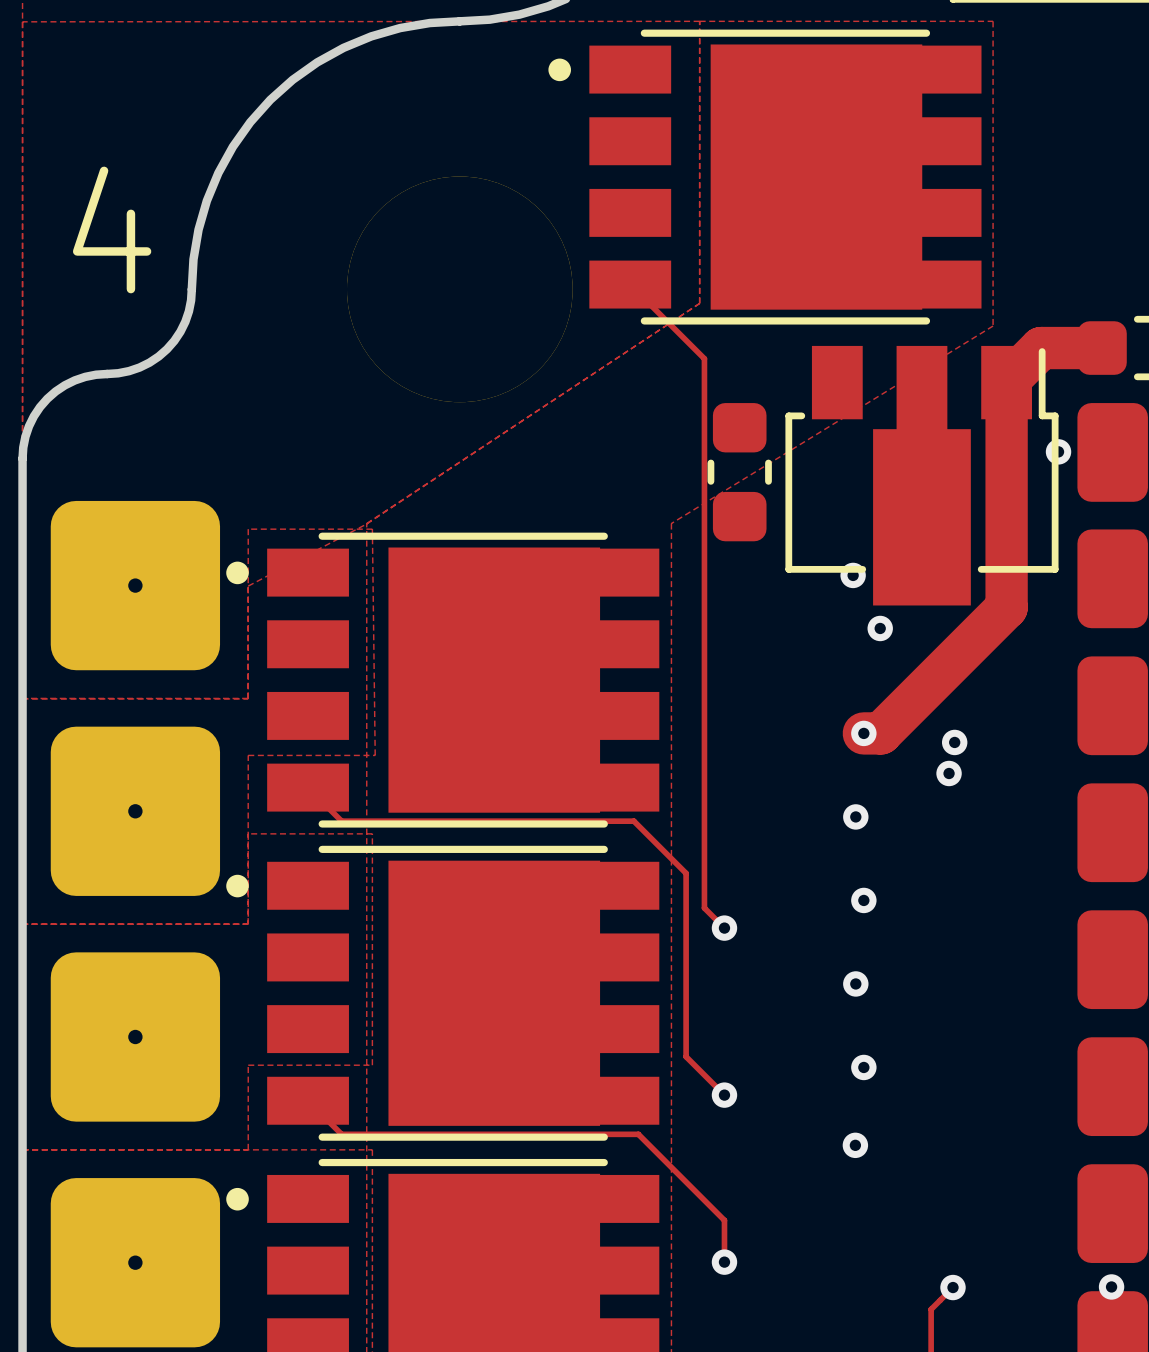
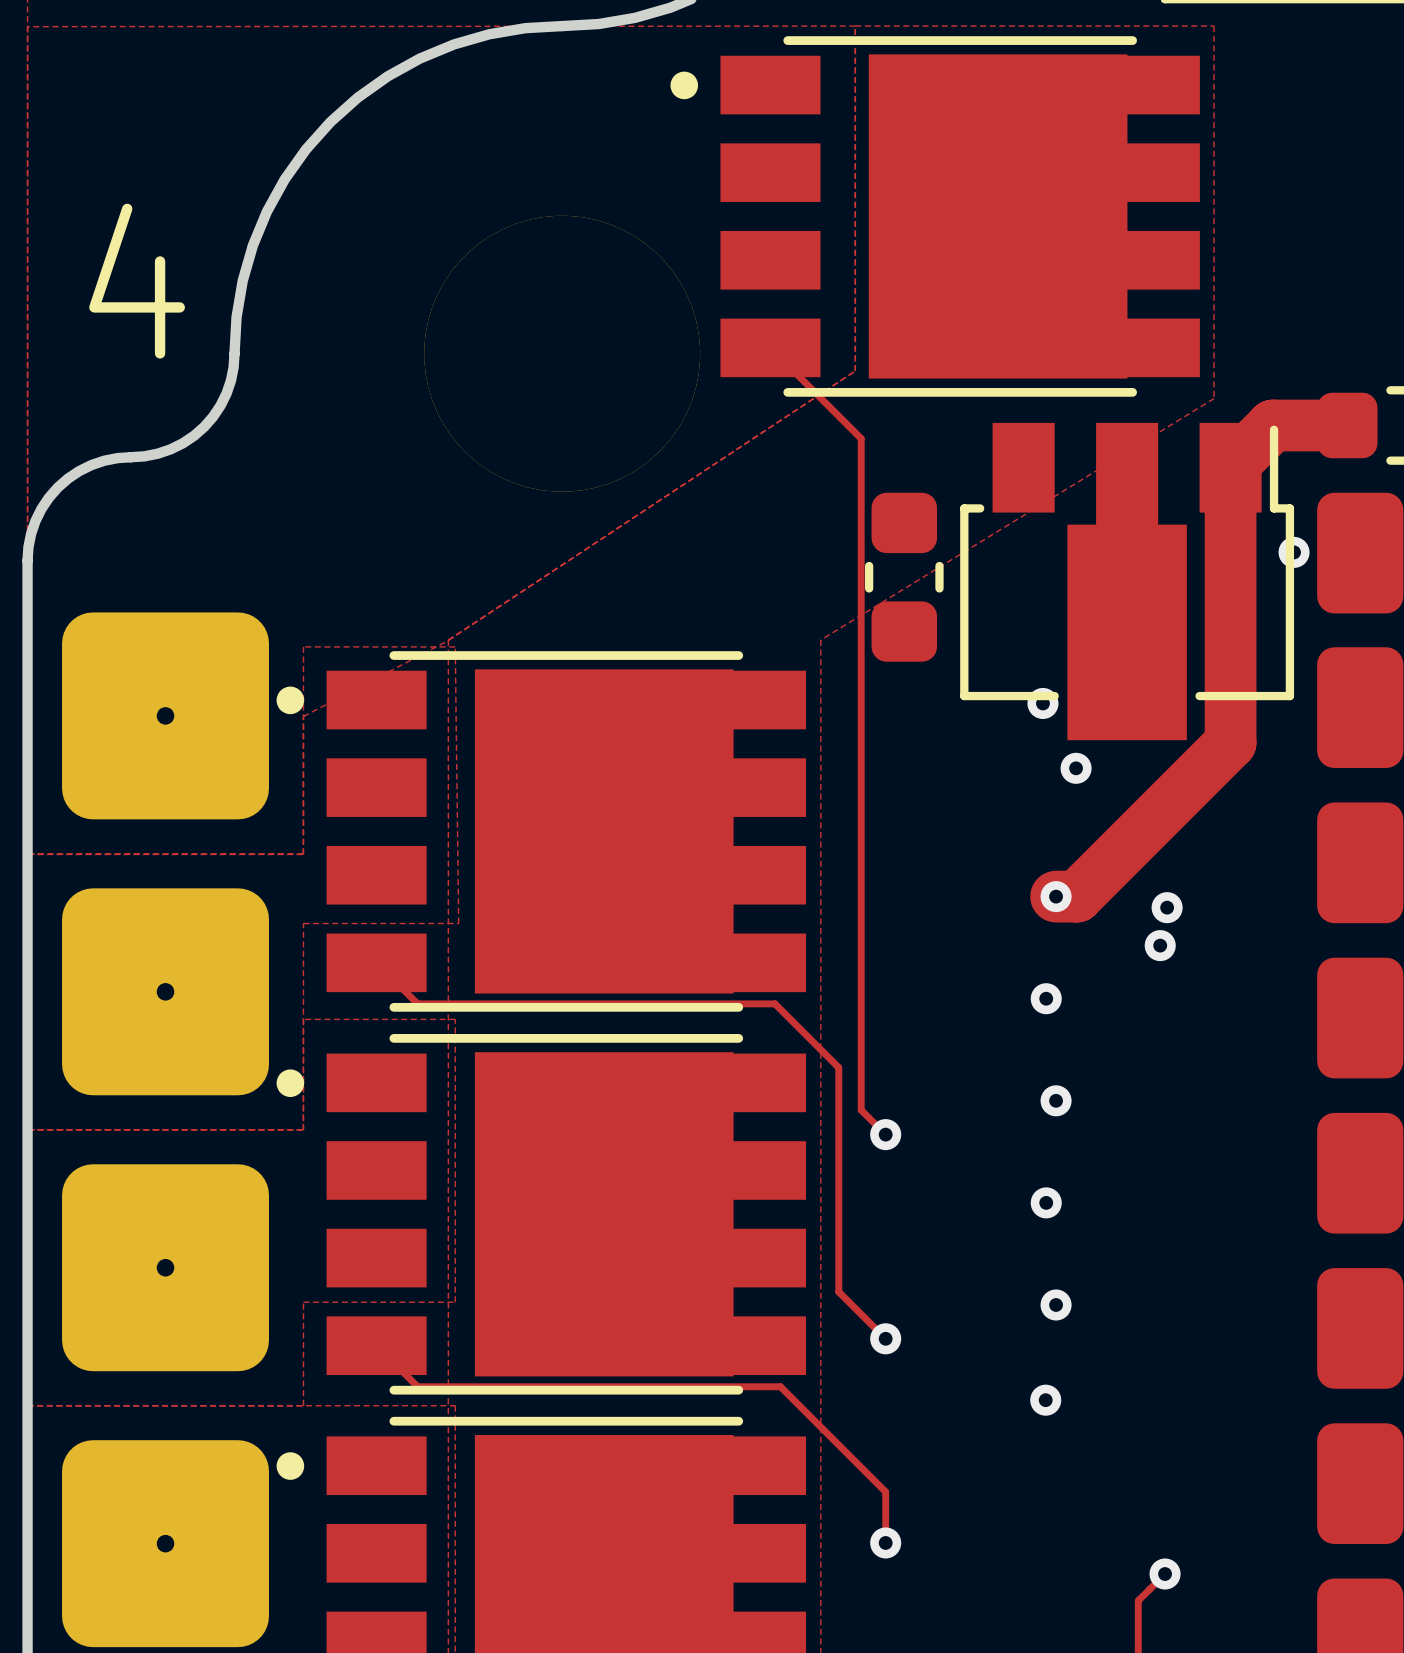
via: (1111, 1286) -> none

